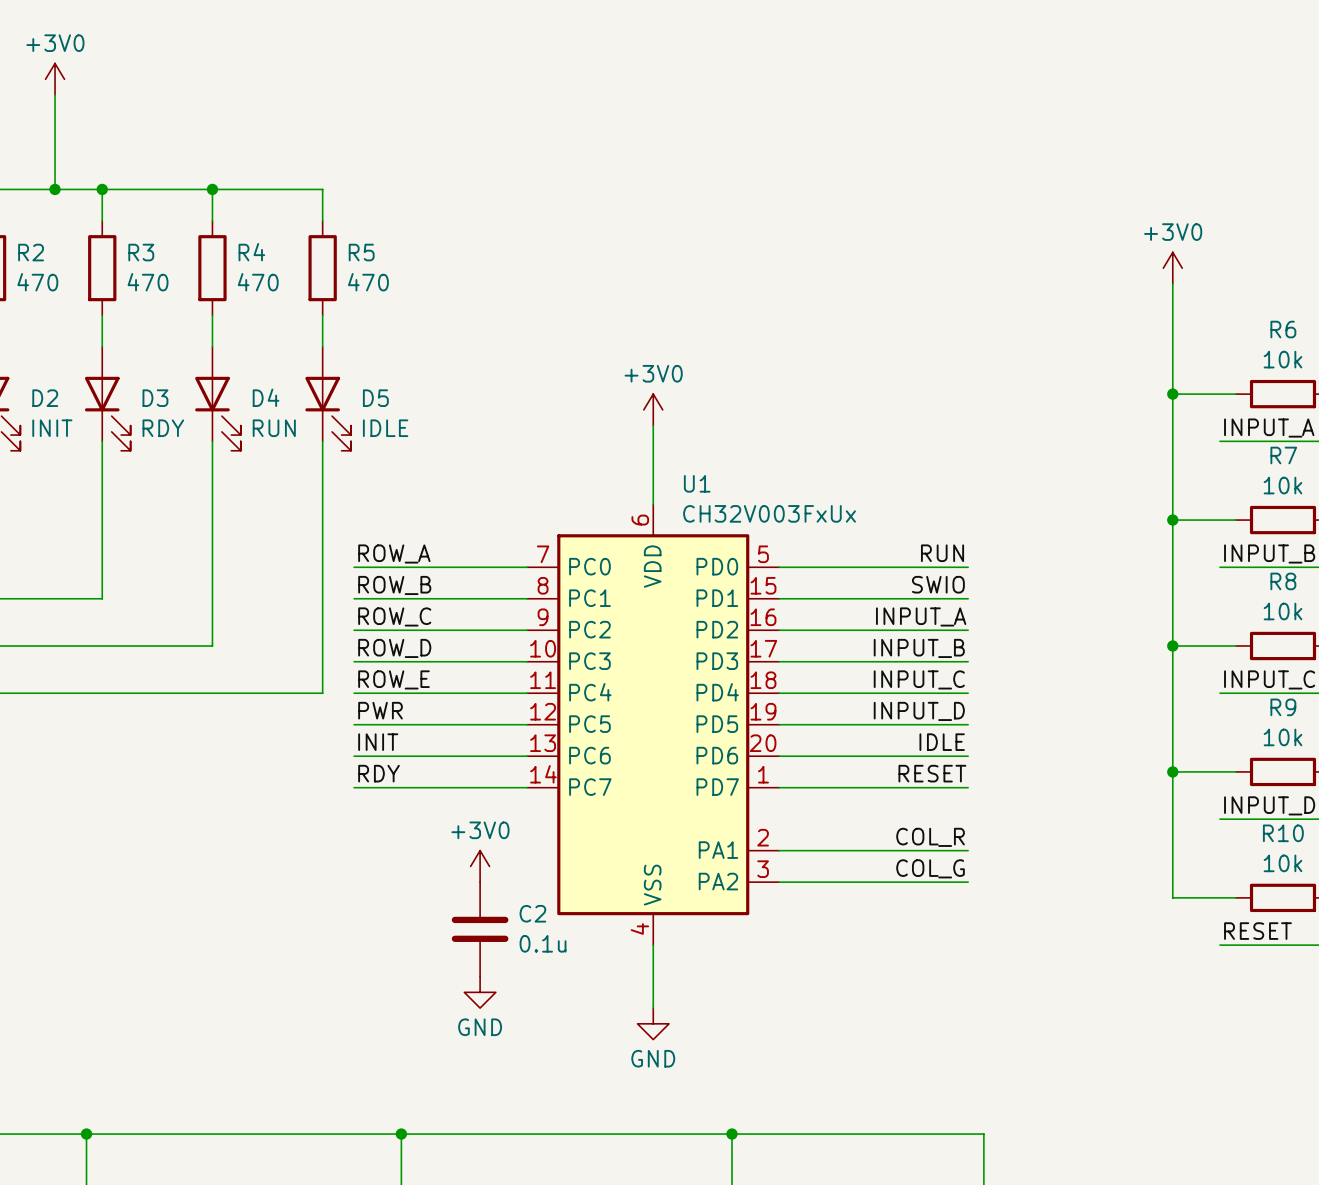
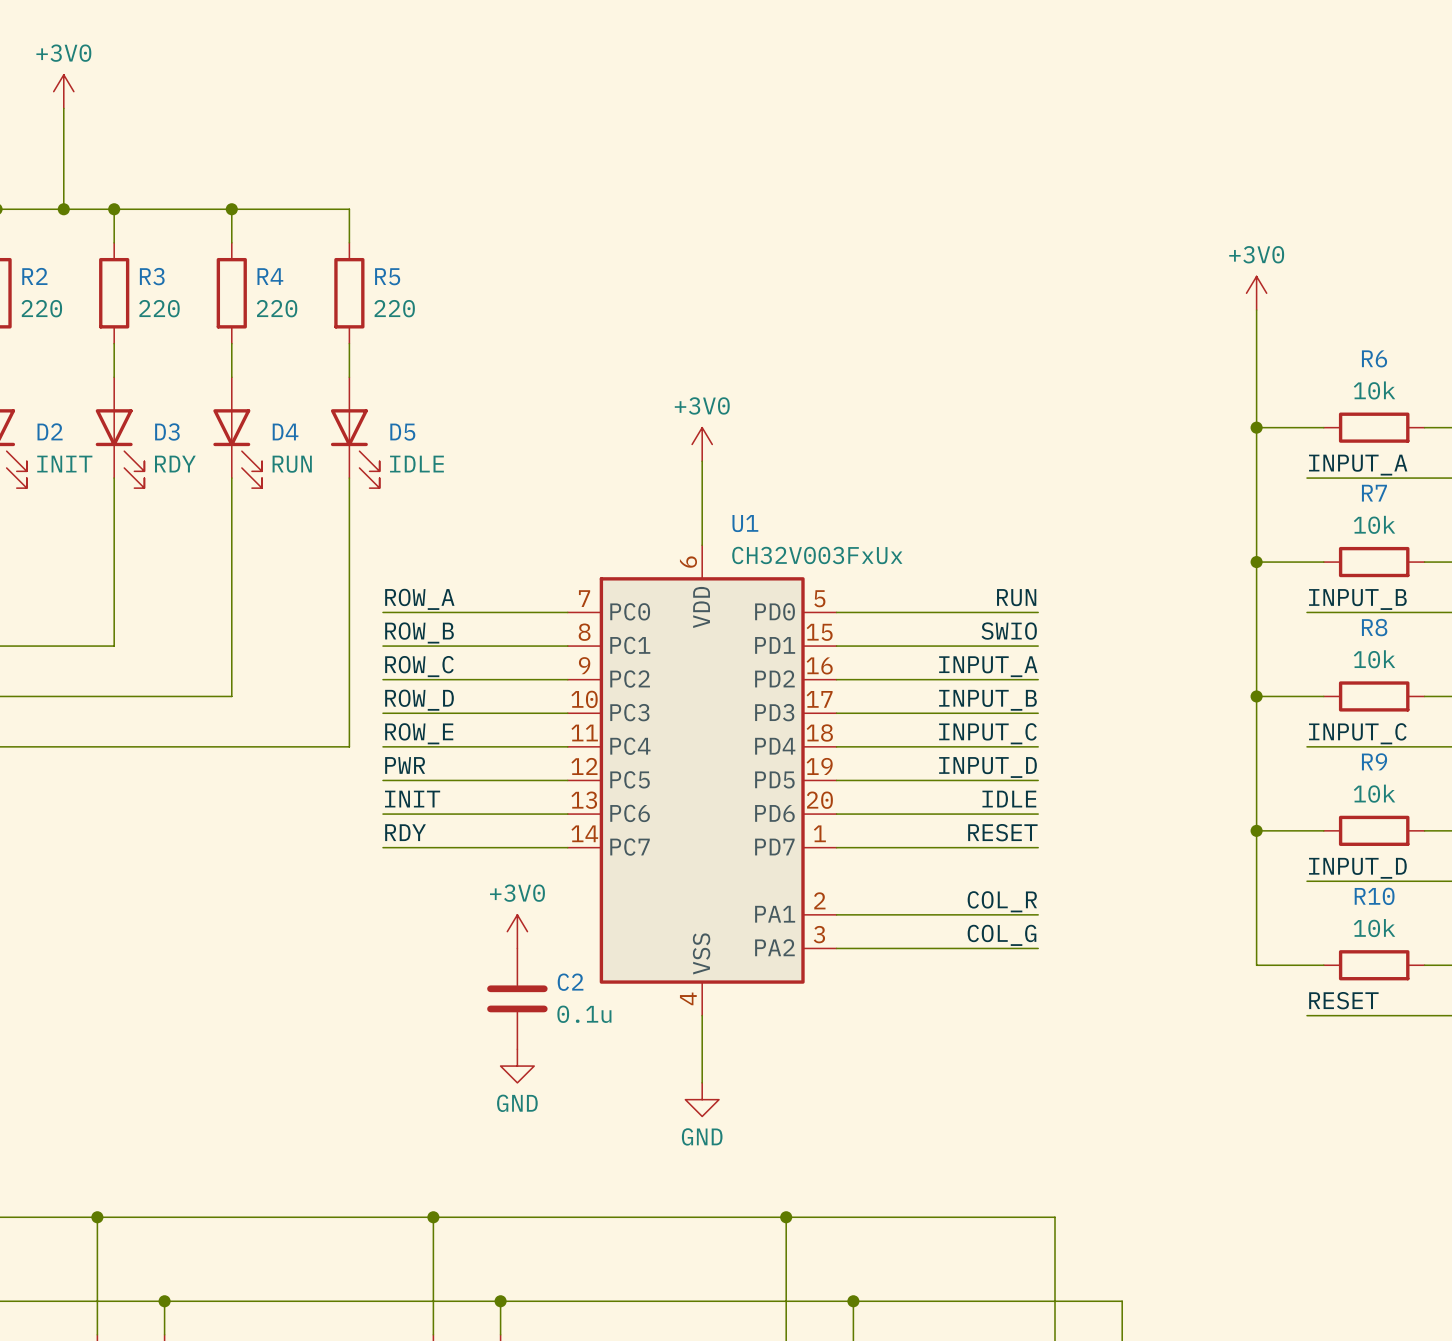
R2 value: 470 (37, 282) -> 220 (41, 308)
R3 value: 470 (148, 282) -> 220 (159, 308)
R4 value: 470 (258, 282) -> 220 (277, 308)
R5 value: 470 (368, 282) -> 220 (394, 308)

